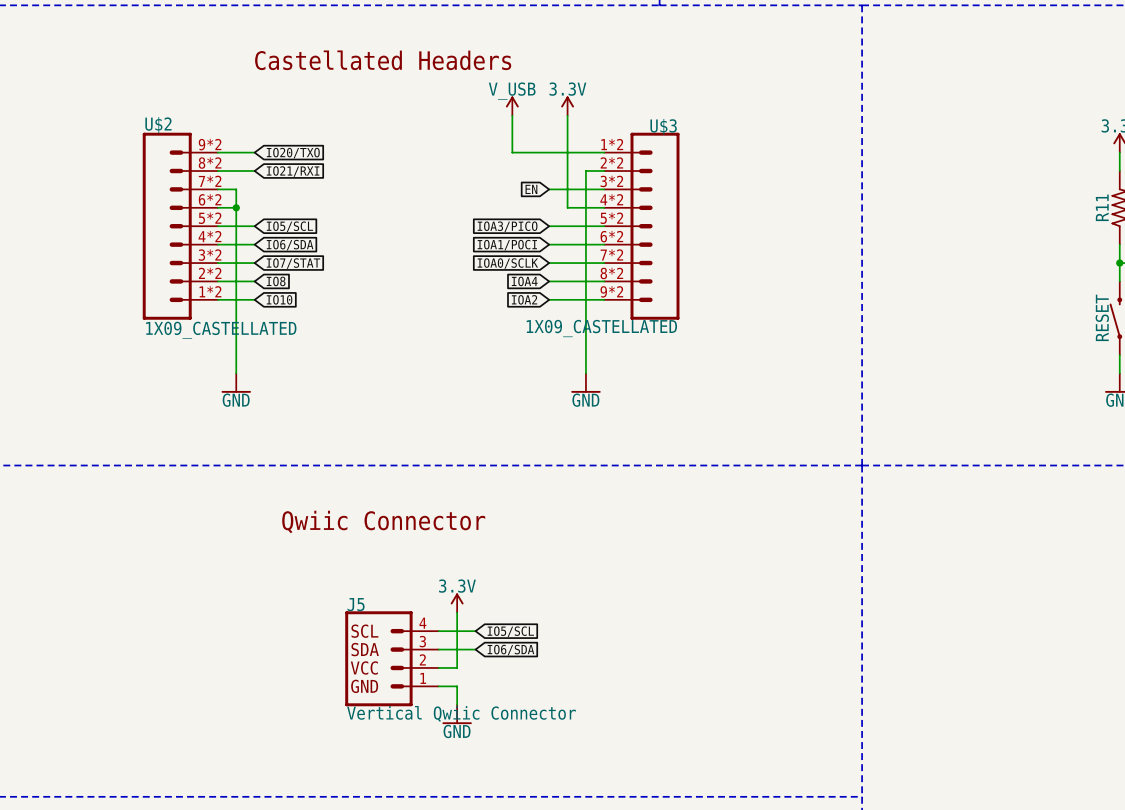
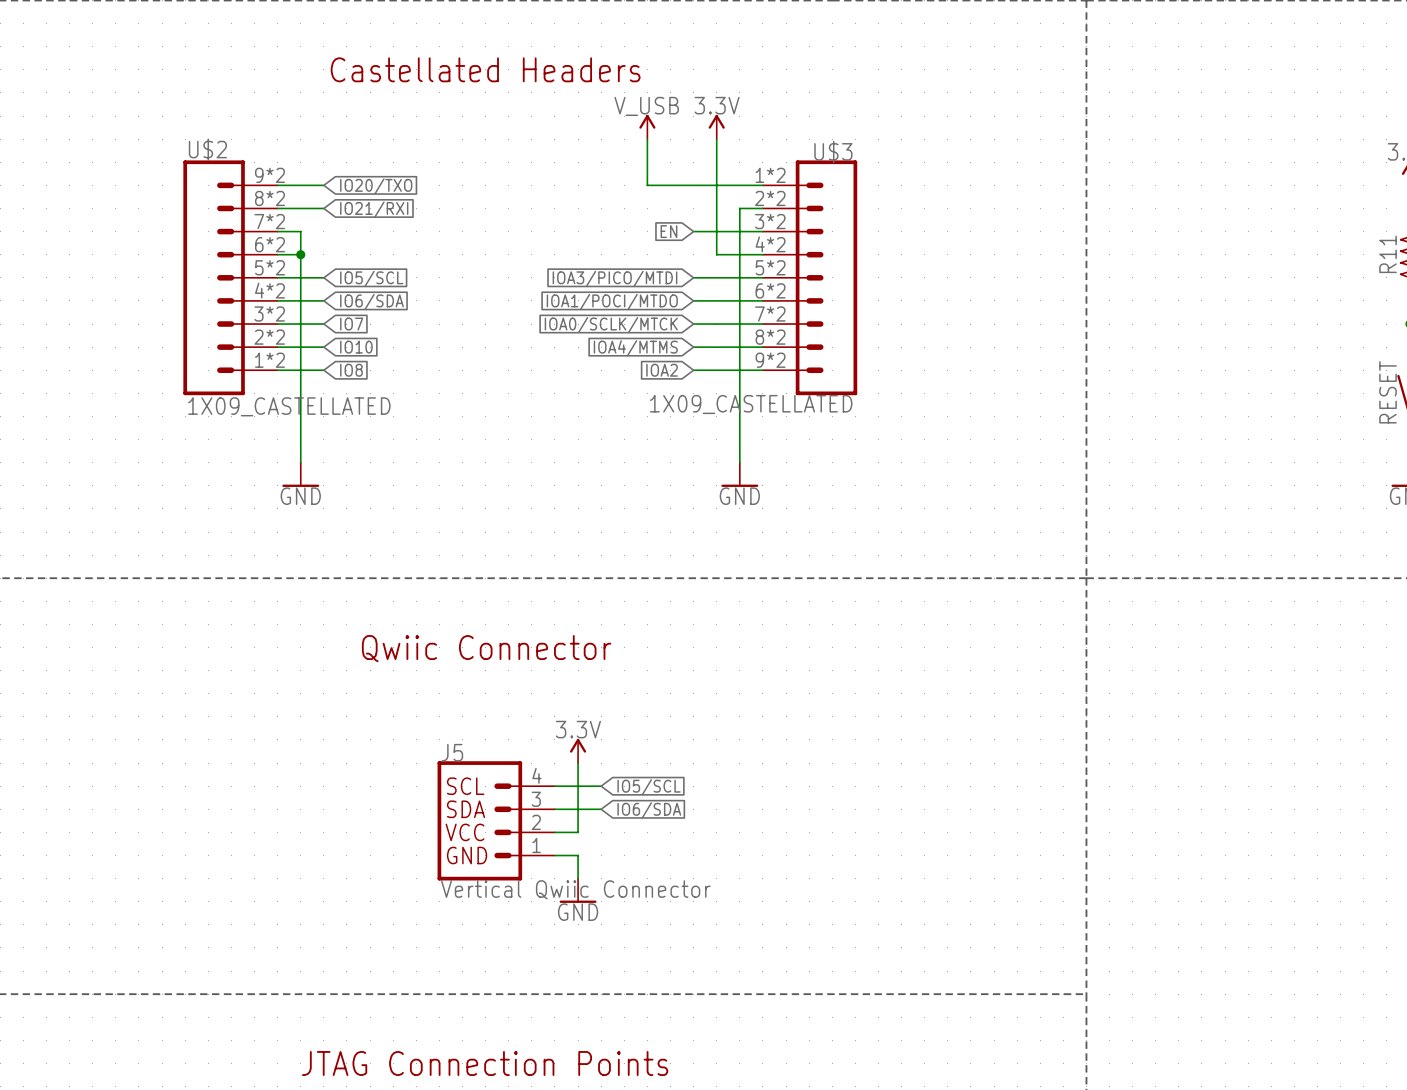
global label: IOA3/PICO (507, 226) -> IOA3/PICO/MTDI (615, 278)
global label: IOA1/POCI (507, 245) -> IOA1/POCI/MTDO (612, 302)
global label: IO7/STAT (293, 263) -> IO7 (351, 324)
global label: IOA0/SCLK (507, 263) -> IOA0/SCLK/MTCK (611, 325)
global label: IO8 (276, 281) -> IO10 (356, 347)
global label: IOA4 (524, 281) -> IOA4/MTMS (635, 348)
global label: IO10 (279, 299) -> IO8 (351, 370)

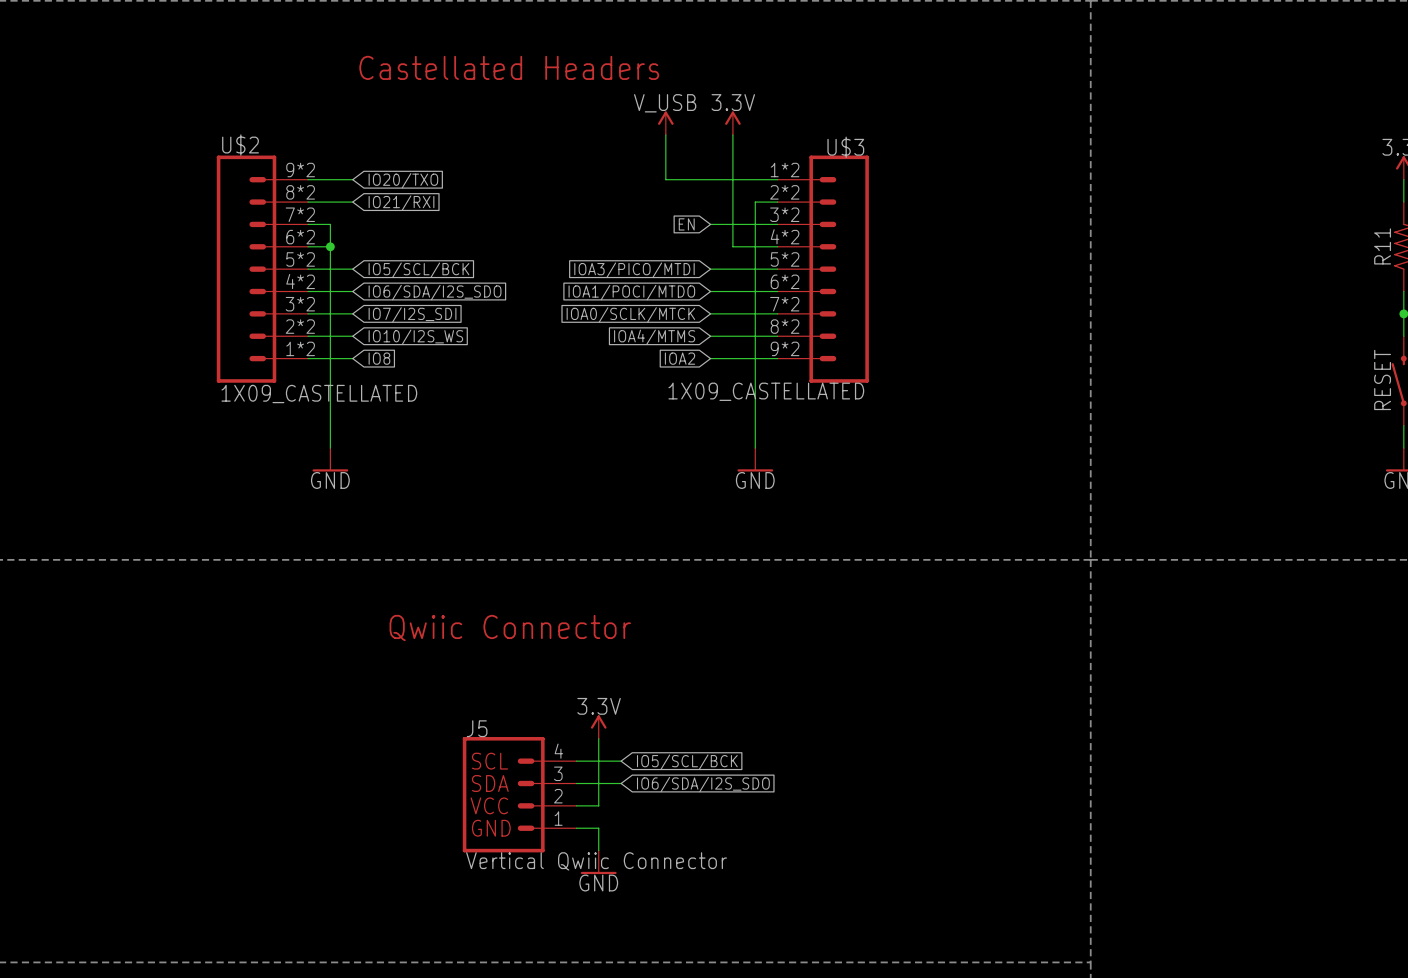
global label: IO5/SCL (371, 278) -> IO5/SCL/BCK (418, 270)
global label: IO6/SDA (372, 302) -> IO6/SDA/I2S_SDO (435, 292)
global label: IO7 (351, 324) -> IO7/I2S_SDI (412, 314)
global label: IO10 (356, 347) -> IO10/I2S_WS (415, 337)
global label: IO5/SCL (649, 787) -> IO5/SCL/BCK (687, 762)
global label: IO6/SDA (649, 810) -> IO6/SDA/I2S_SDO (703, 784)

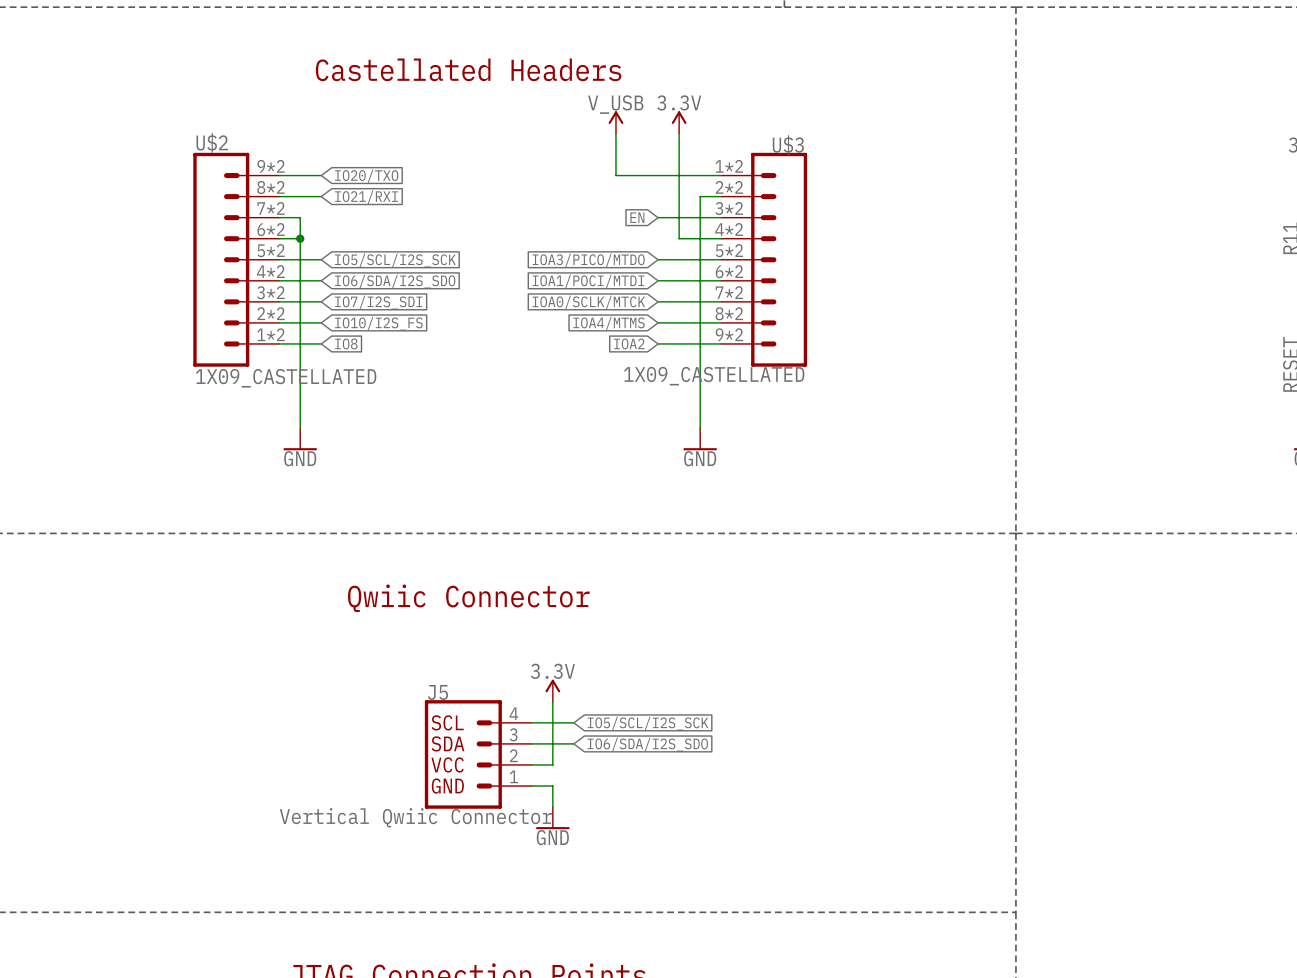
global label: IO5/SCL/BCK (418, 270) -> IO5/SCL/I2S_SCK (395, 260)
global label: IOA3/PICO/MTDI (634, 270) -> IOA3/PICO/MTDO (588, 260)
global label: IOA1/POCI/MTDO (631, 292) -> IOA1/POCI/MTDI (588, 281)
global label: IO10/I2S_WS (415, 337) -> IO10/I2S_FS (378, 323)
global label: IO5/SCL/BCK (687, 762) -> IO5/SCL/I2S_SCK (648, 723)
J5 value position: Vertical Qwiic Connector (596, 861) -> Vertical Qwiic Connector (415, 817)

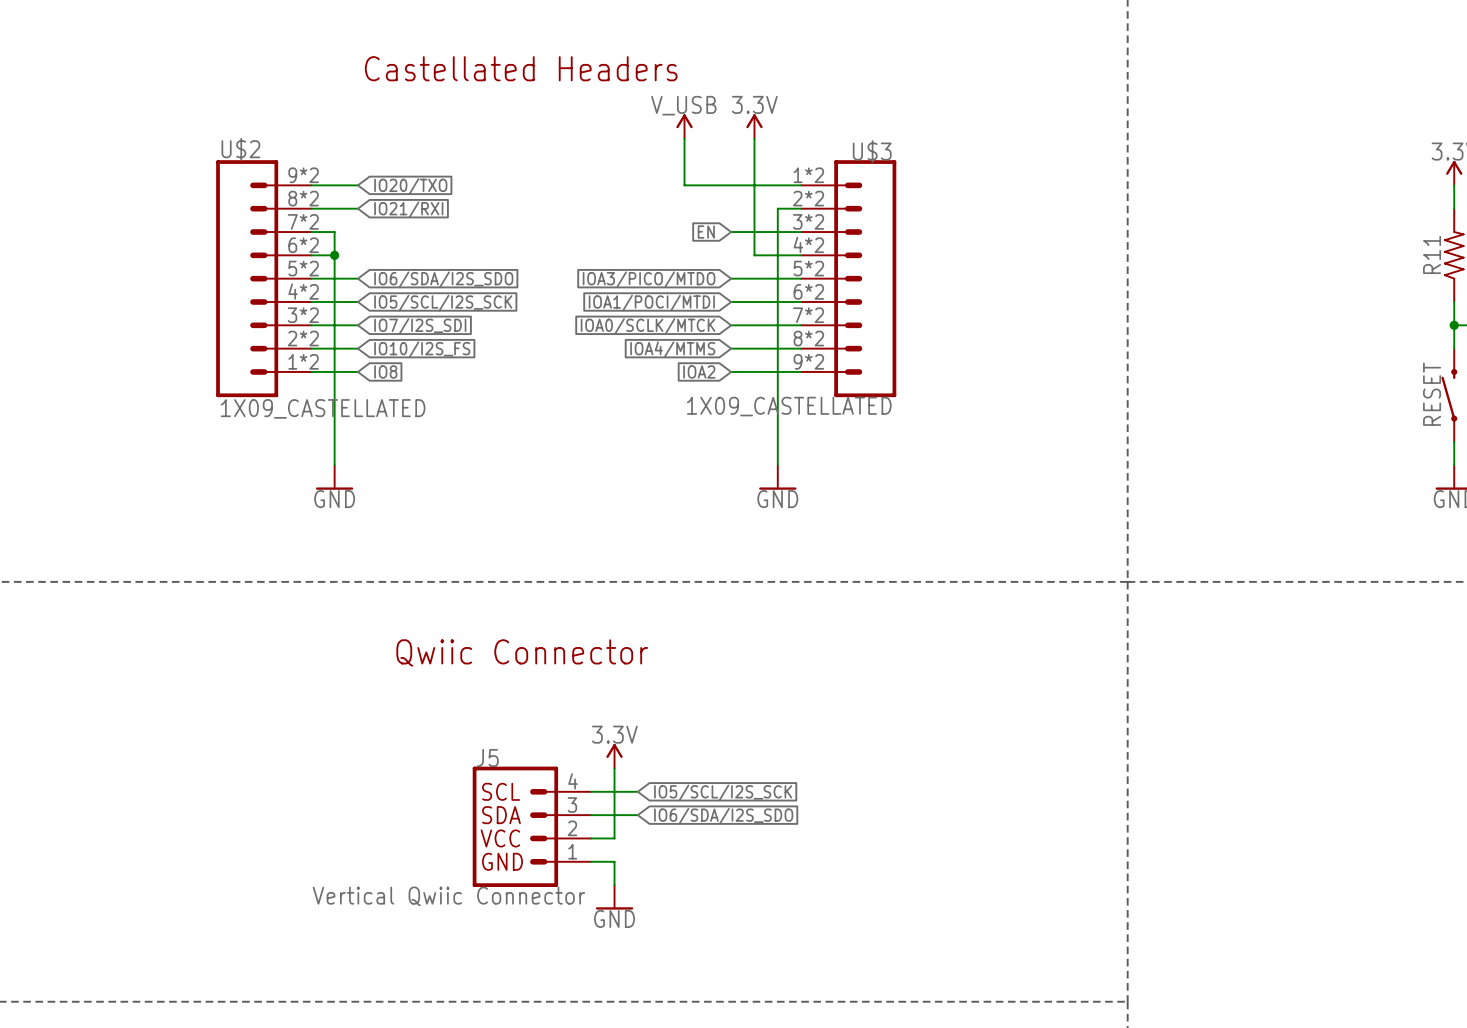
global label: IO5/SCL/I2S_SCK (395, 260) -> IO6/SDA/I2S_SDO (443, 279)
global label: IO6/SDA/I2S_SDO (395, 281) -> IO5/SCL/I2S_SCK (443, 303)

